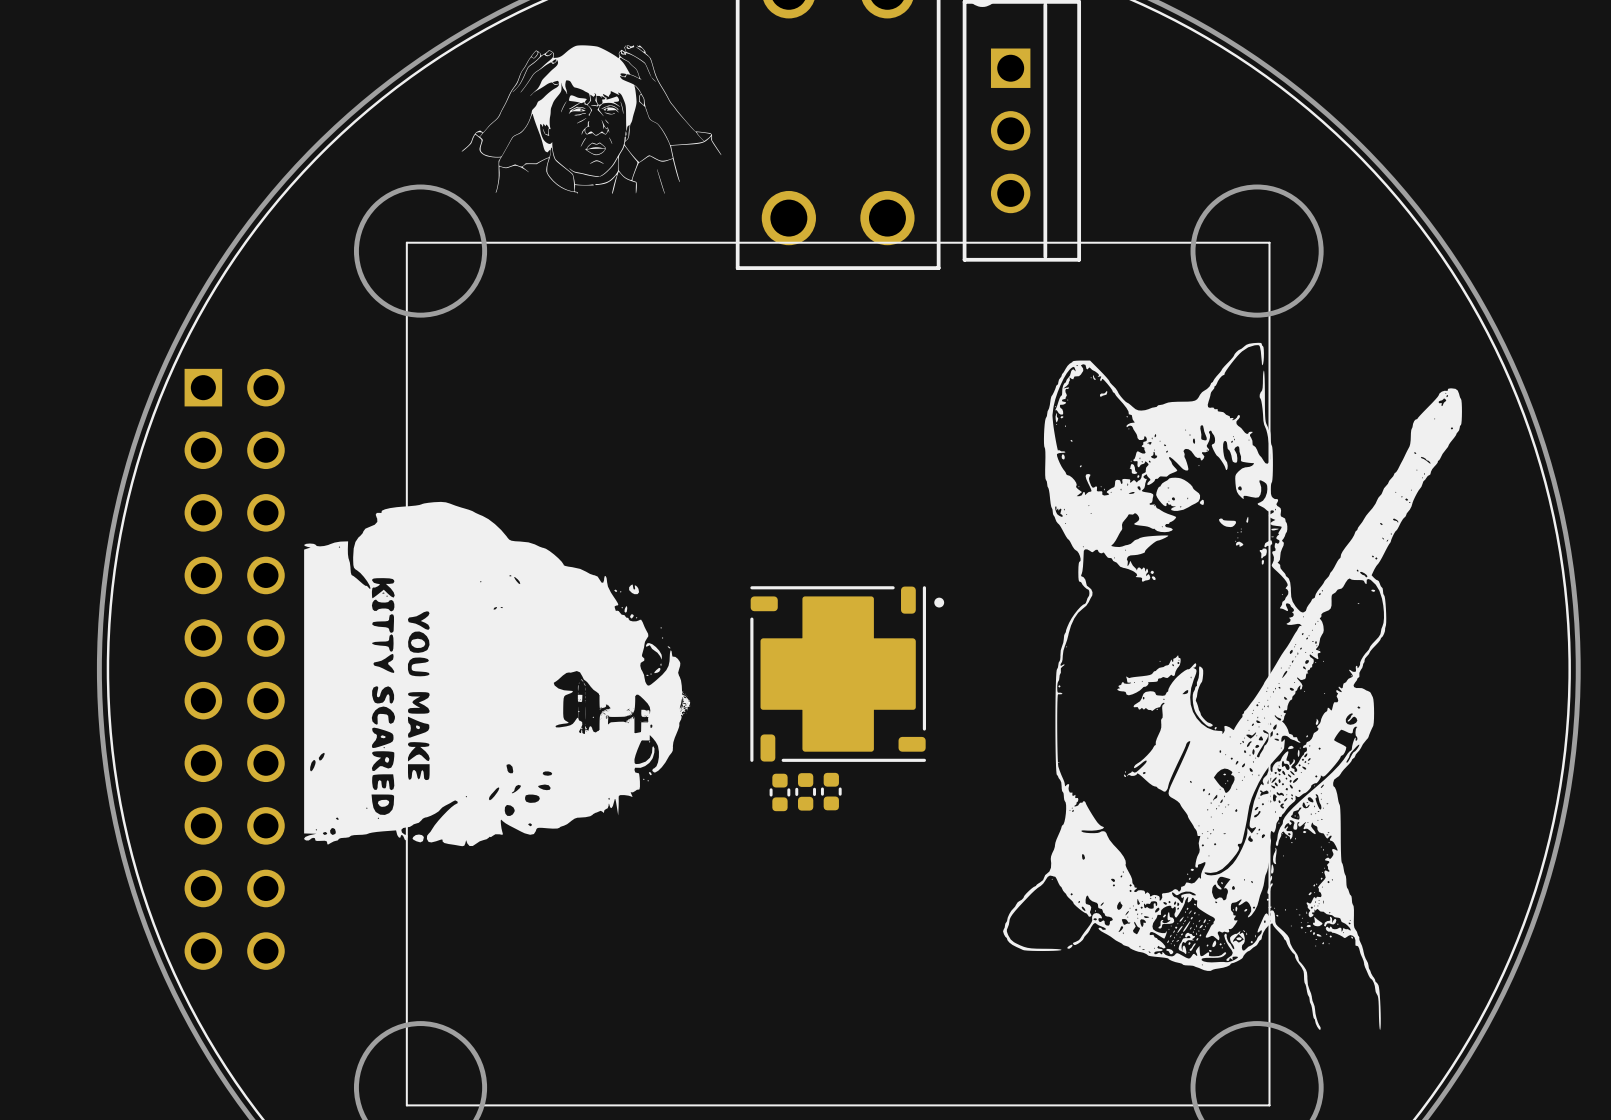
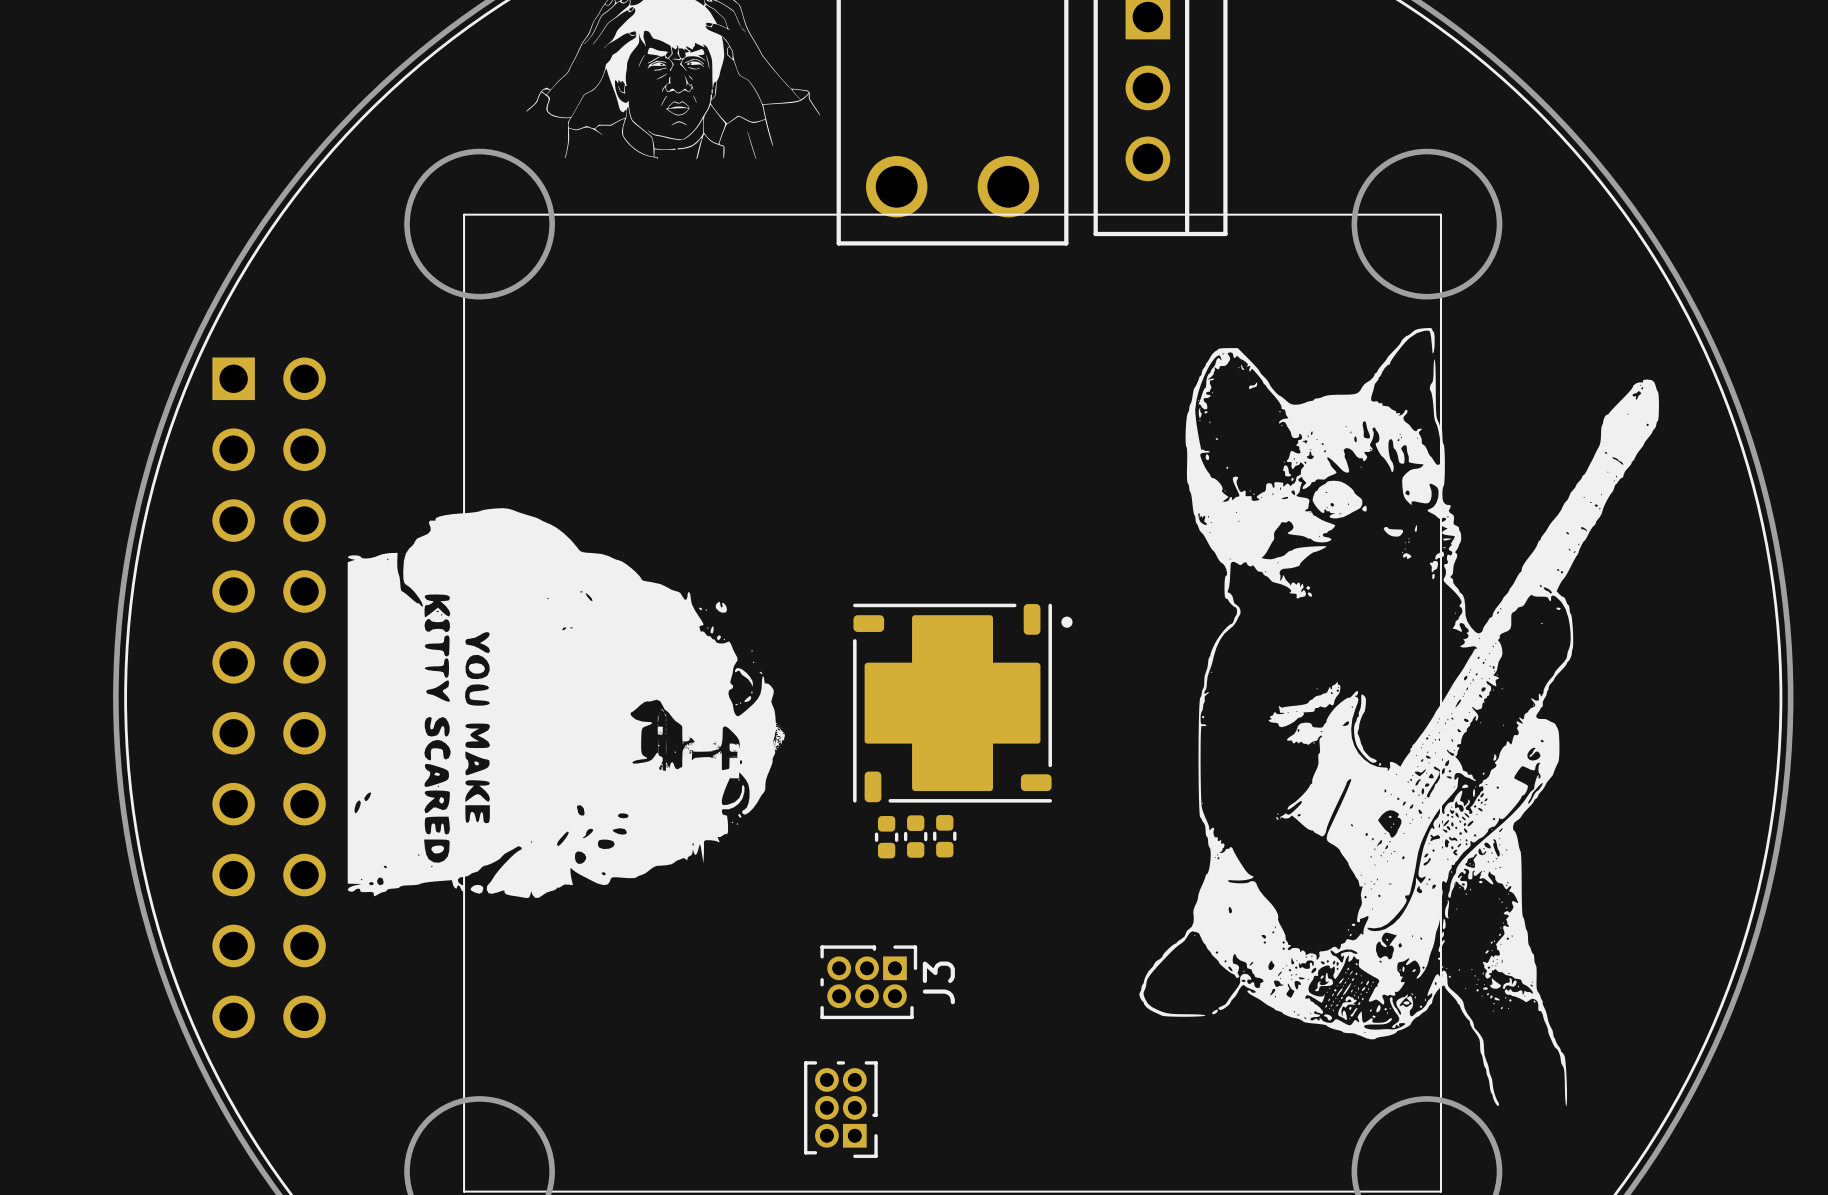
J3: none -> (868, 982)
part: none -> (840, 1109)

